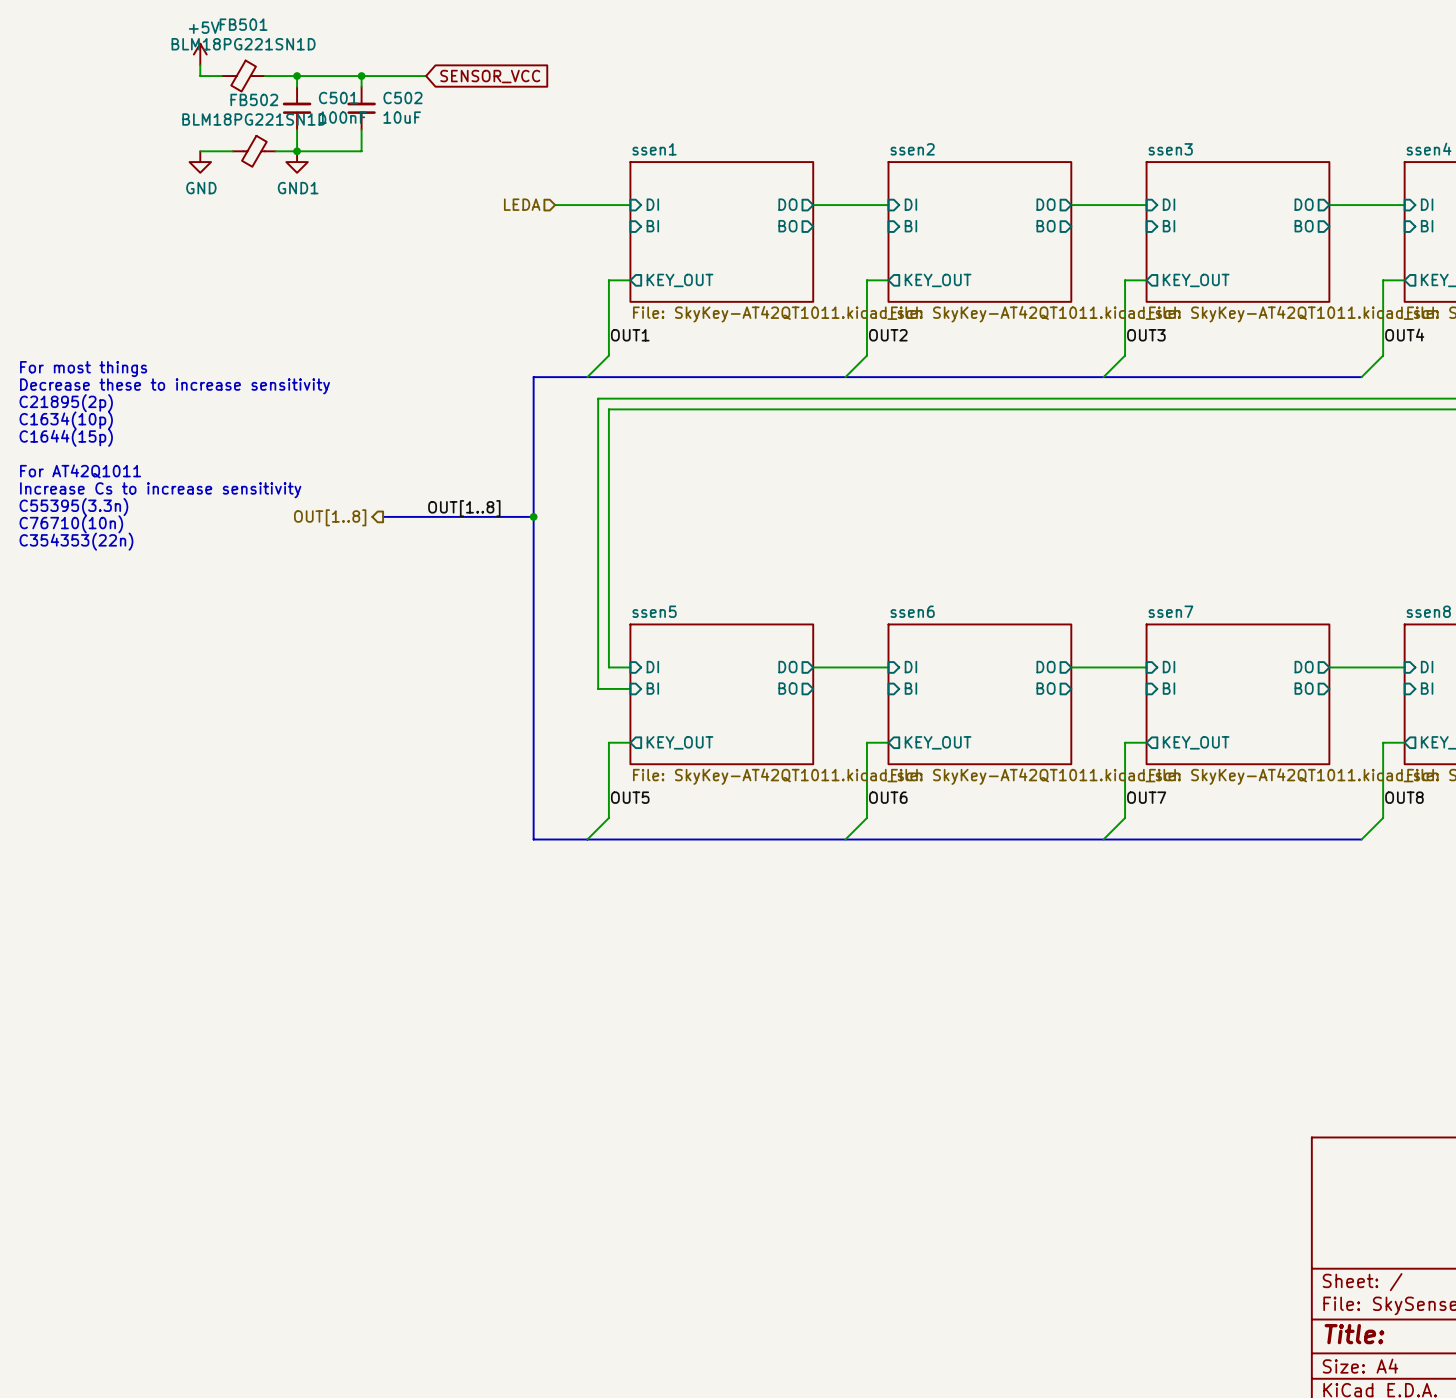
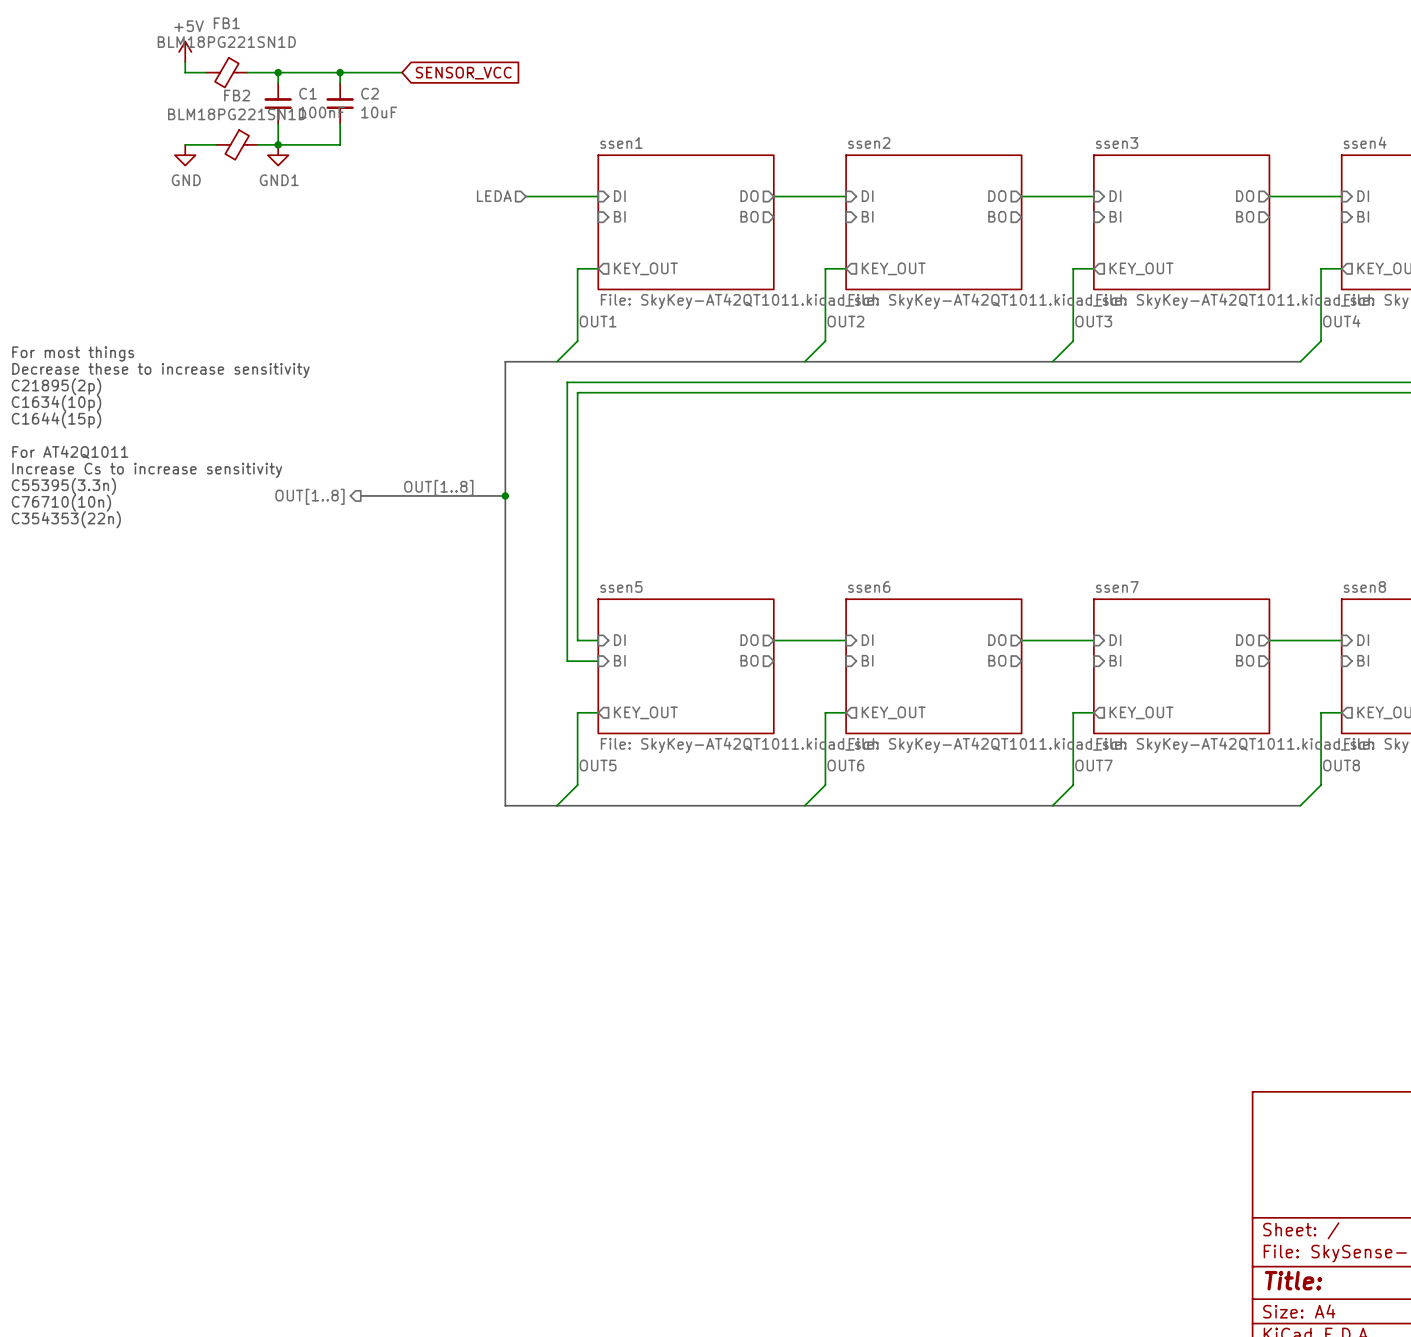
FB501 name: FB501 (243, 24) -> FB1 (226, 23)
C501 name: C501 (338, 98) -> C1 (308, 93)
C502 name: C502 (402, 98) -> C2 (370, 93)
FB502 name: FB502 (254, 99) -> FB2 (237, 95)

